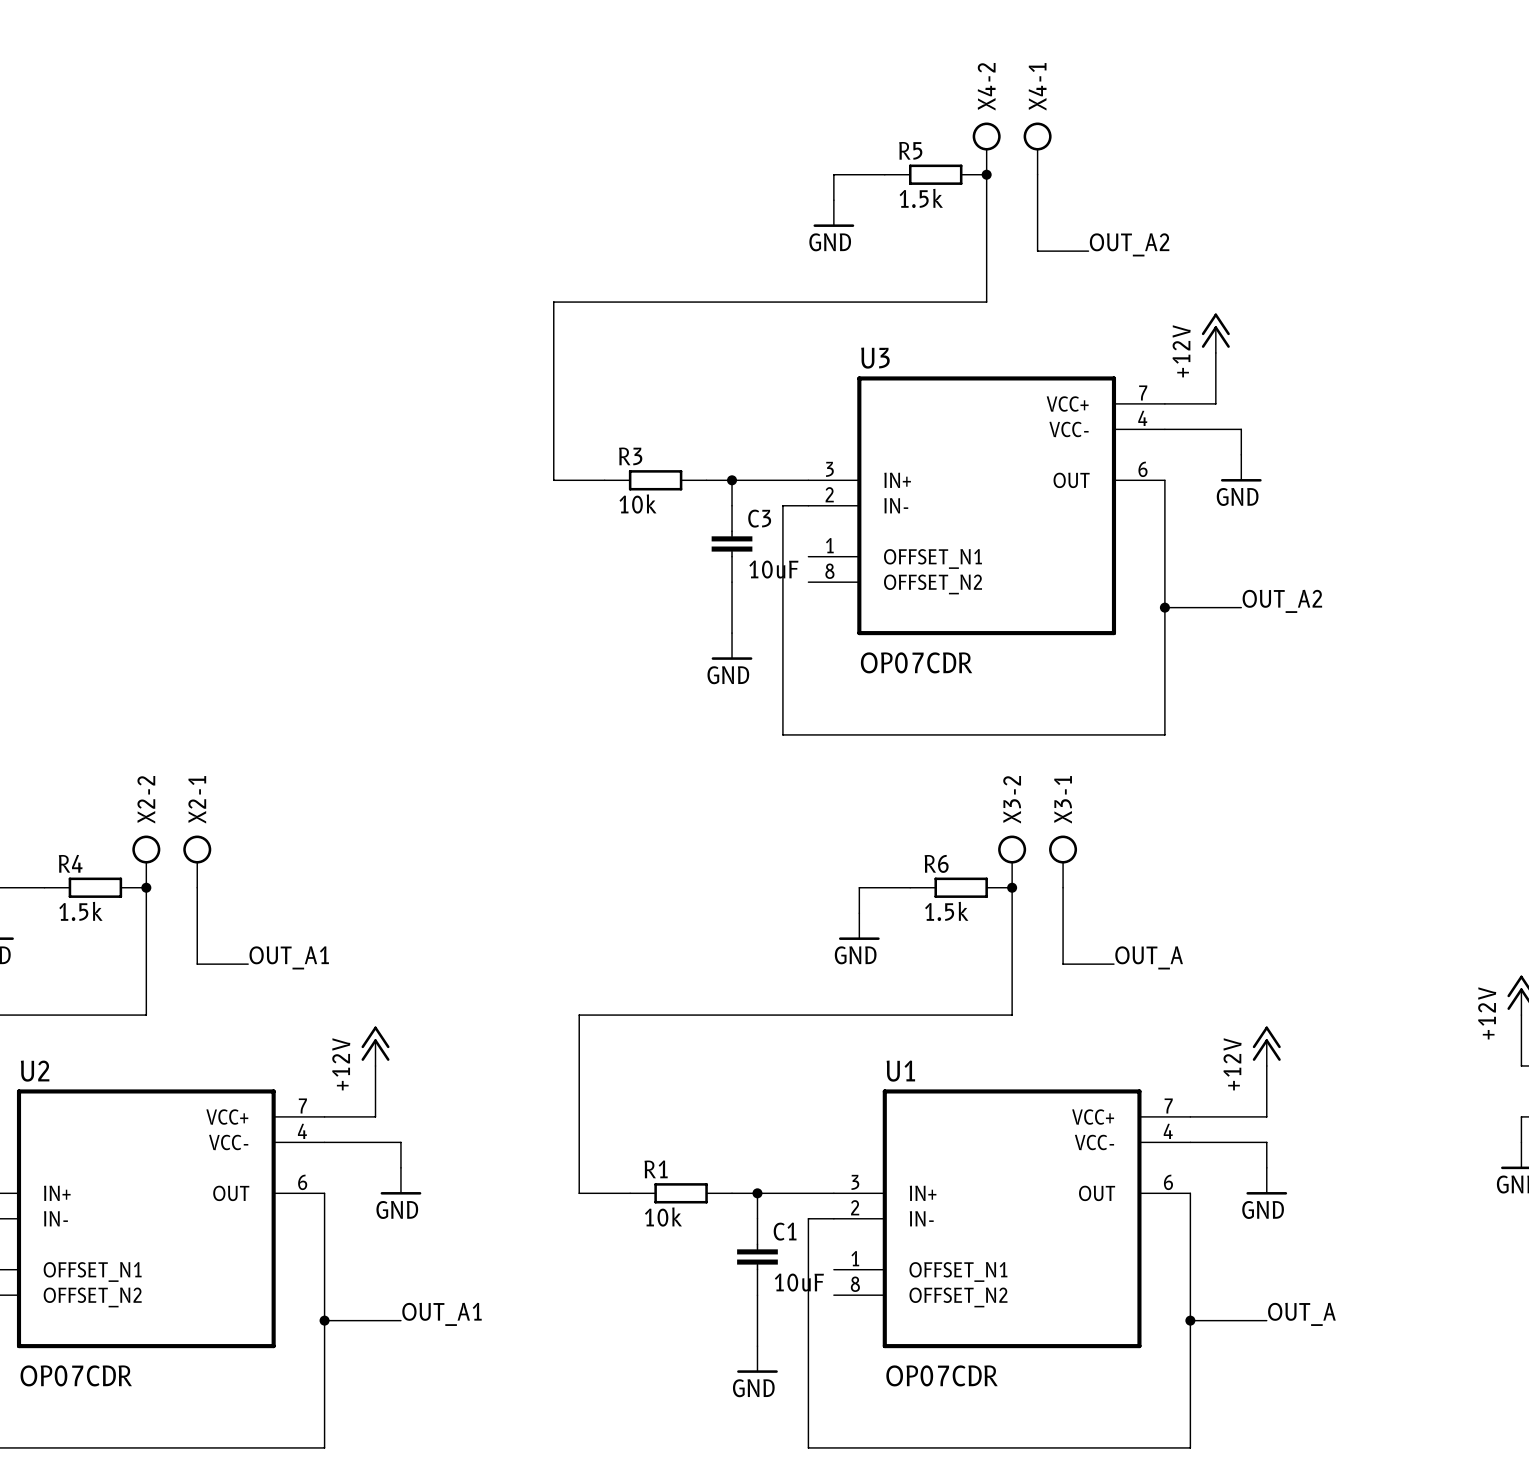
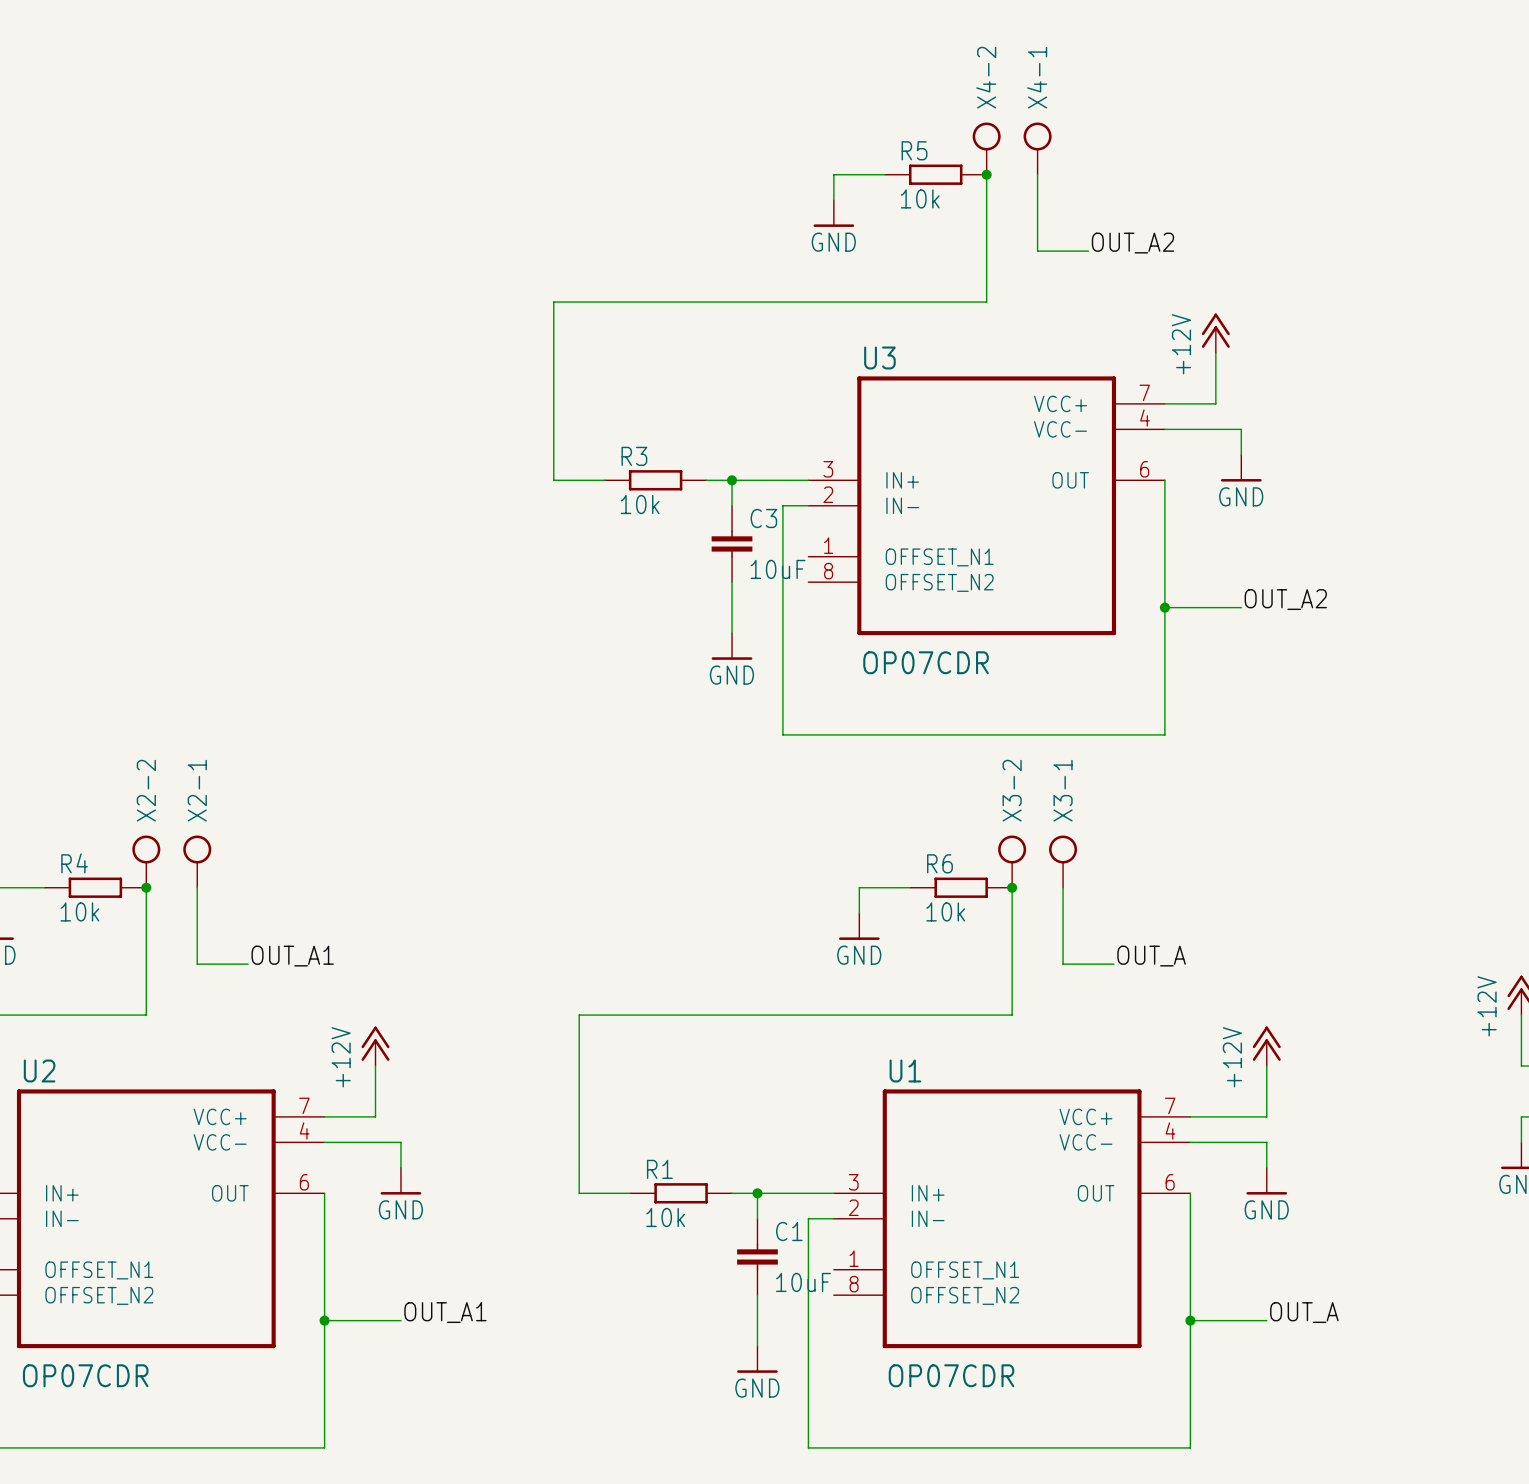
R5 value: 1.5k (921, 198) -> 10k (920, 198)
R4 value: 1.5k (80, 911) -> 10k (79, 911)
R6 value: 1.5k (946, 911) -> 10k (945, 911)

